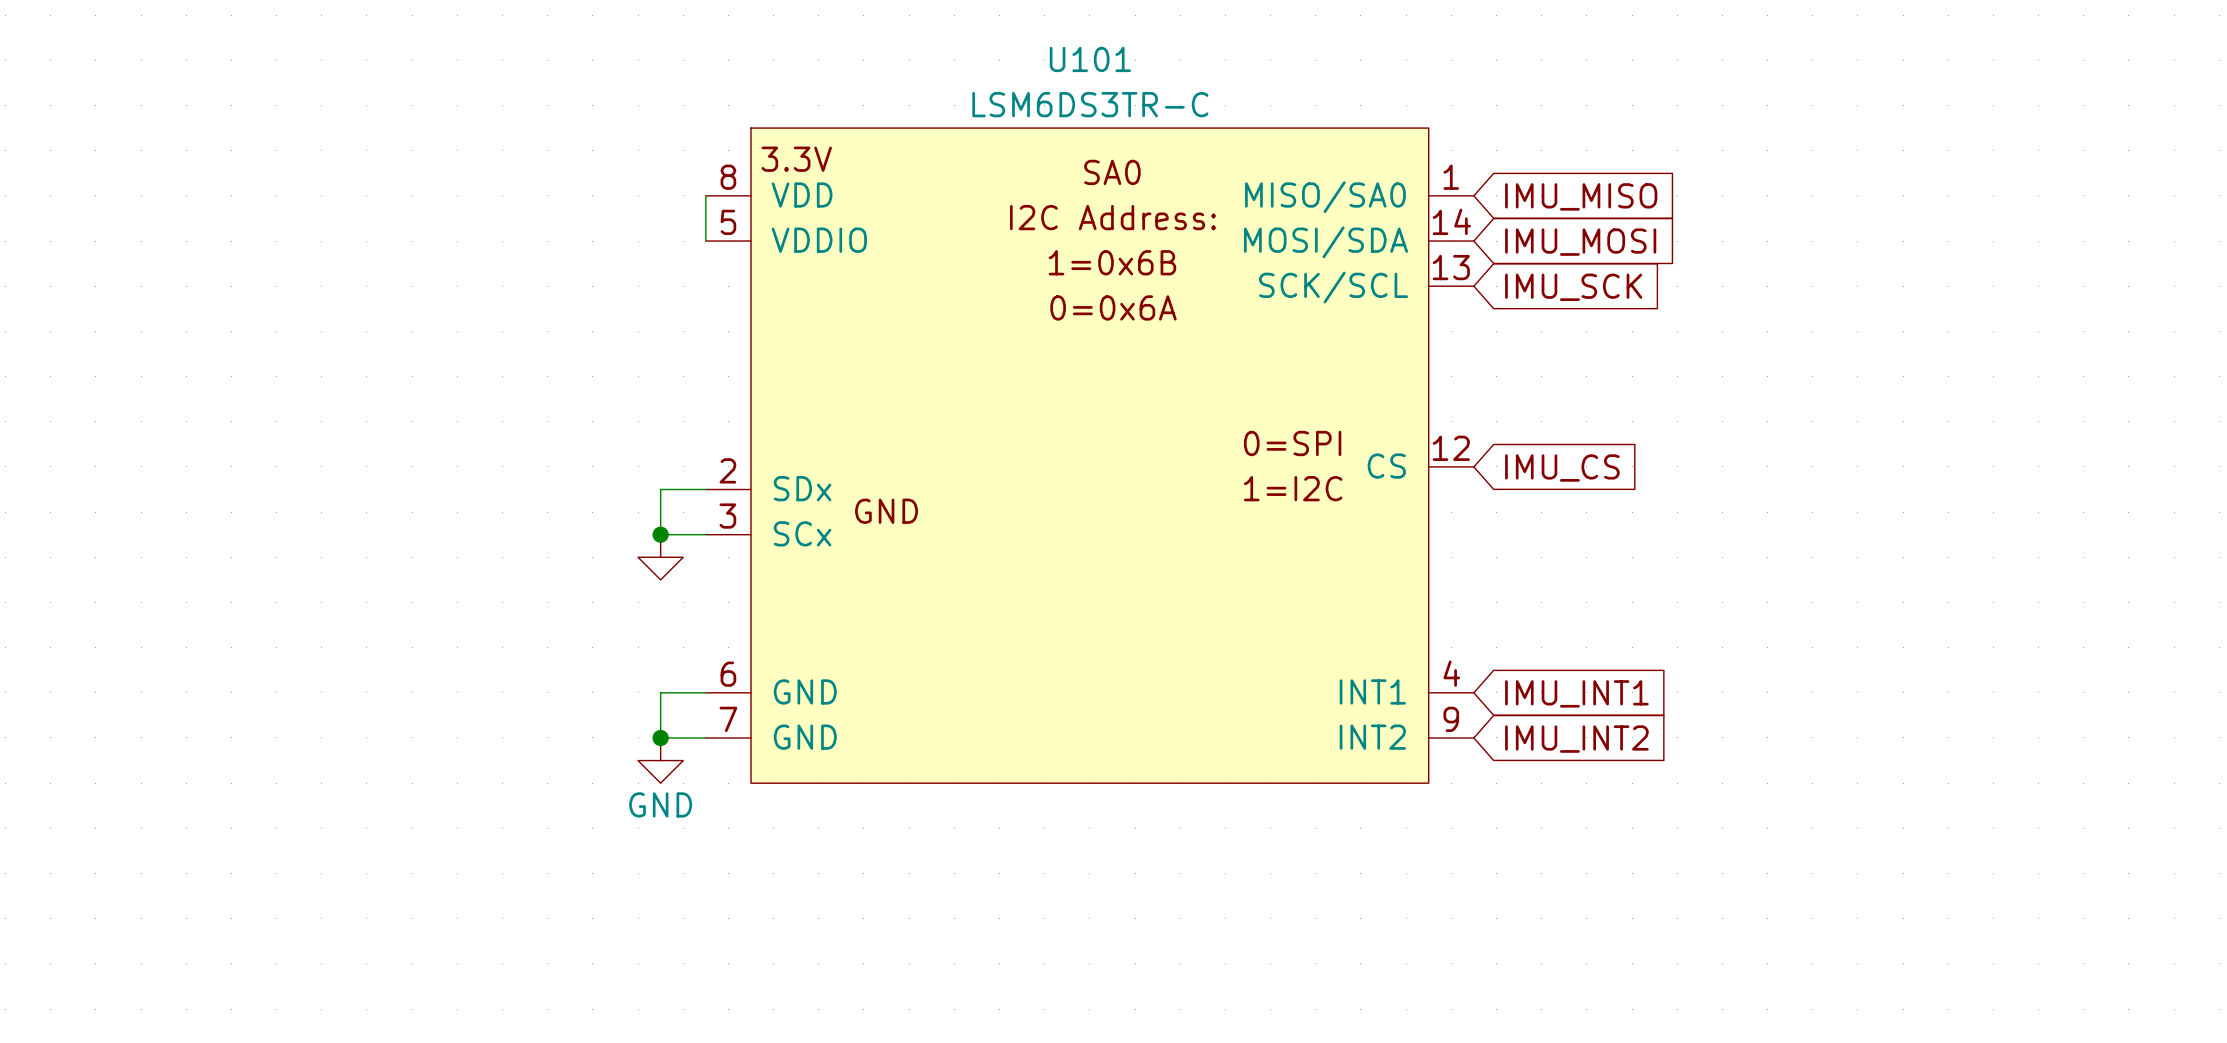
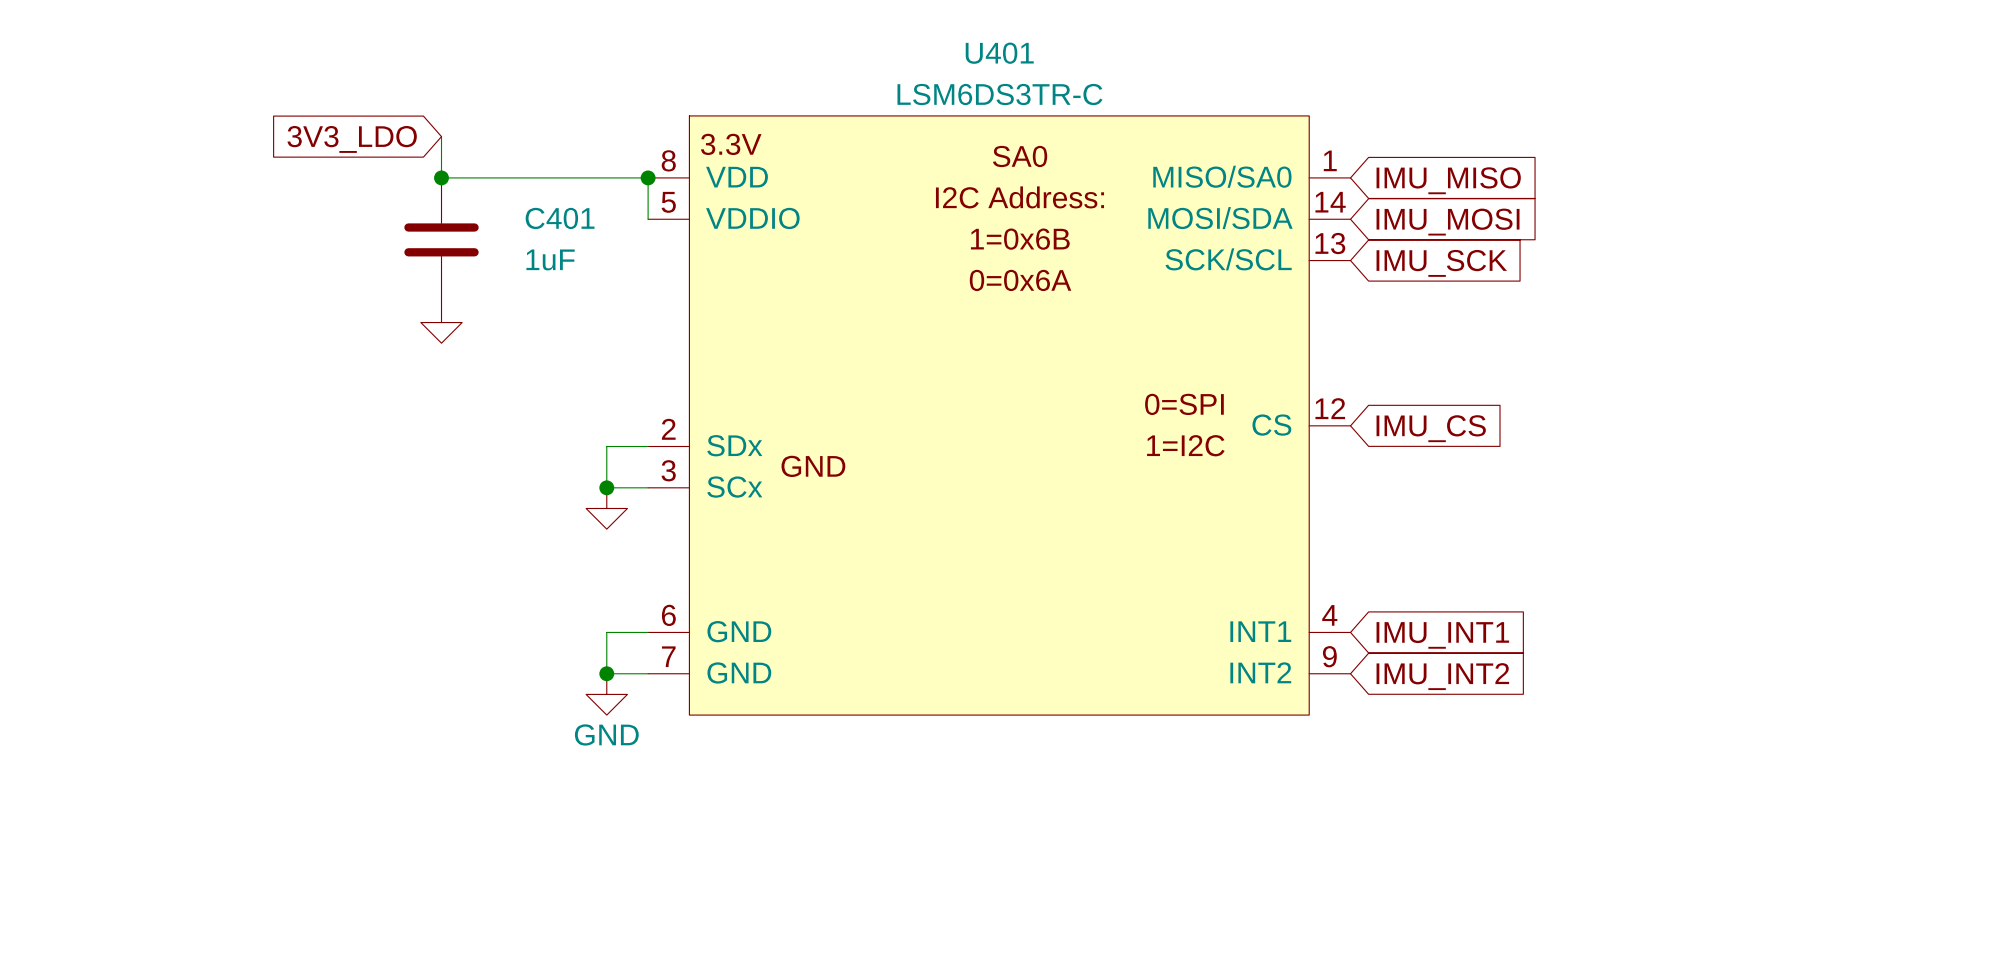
U101 name: U101 (1090, 59) -> U401 (999, 53)
wire: none -> (441, 136) (441, 177) (648, 177)
global label: none -> 3V3_LDO (352, 139)
junction: none -> (441, 177)
junction: none -> (648, 177)
C401: none -> 1uF (441, 239)
power symbol: none -> (441, 322)

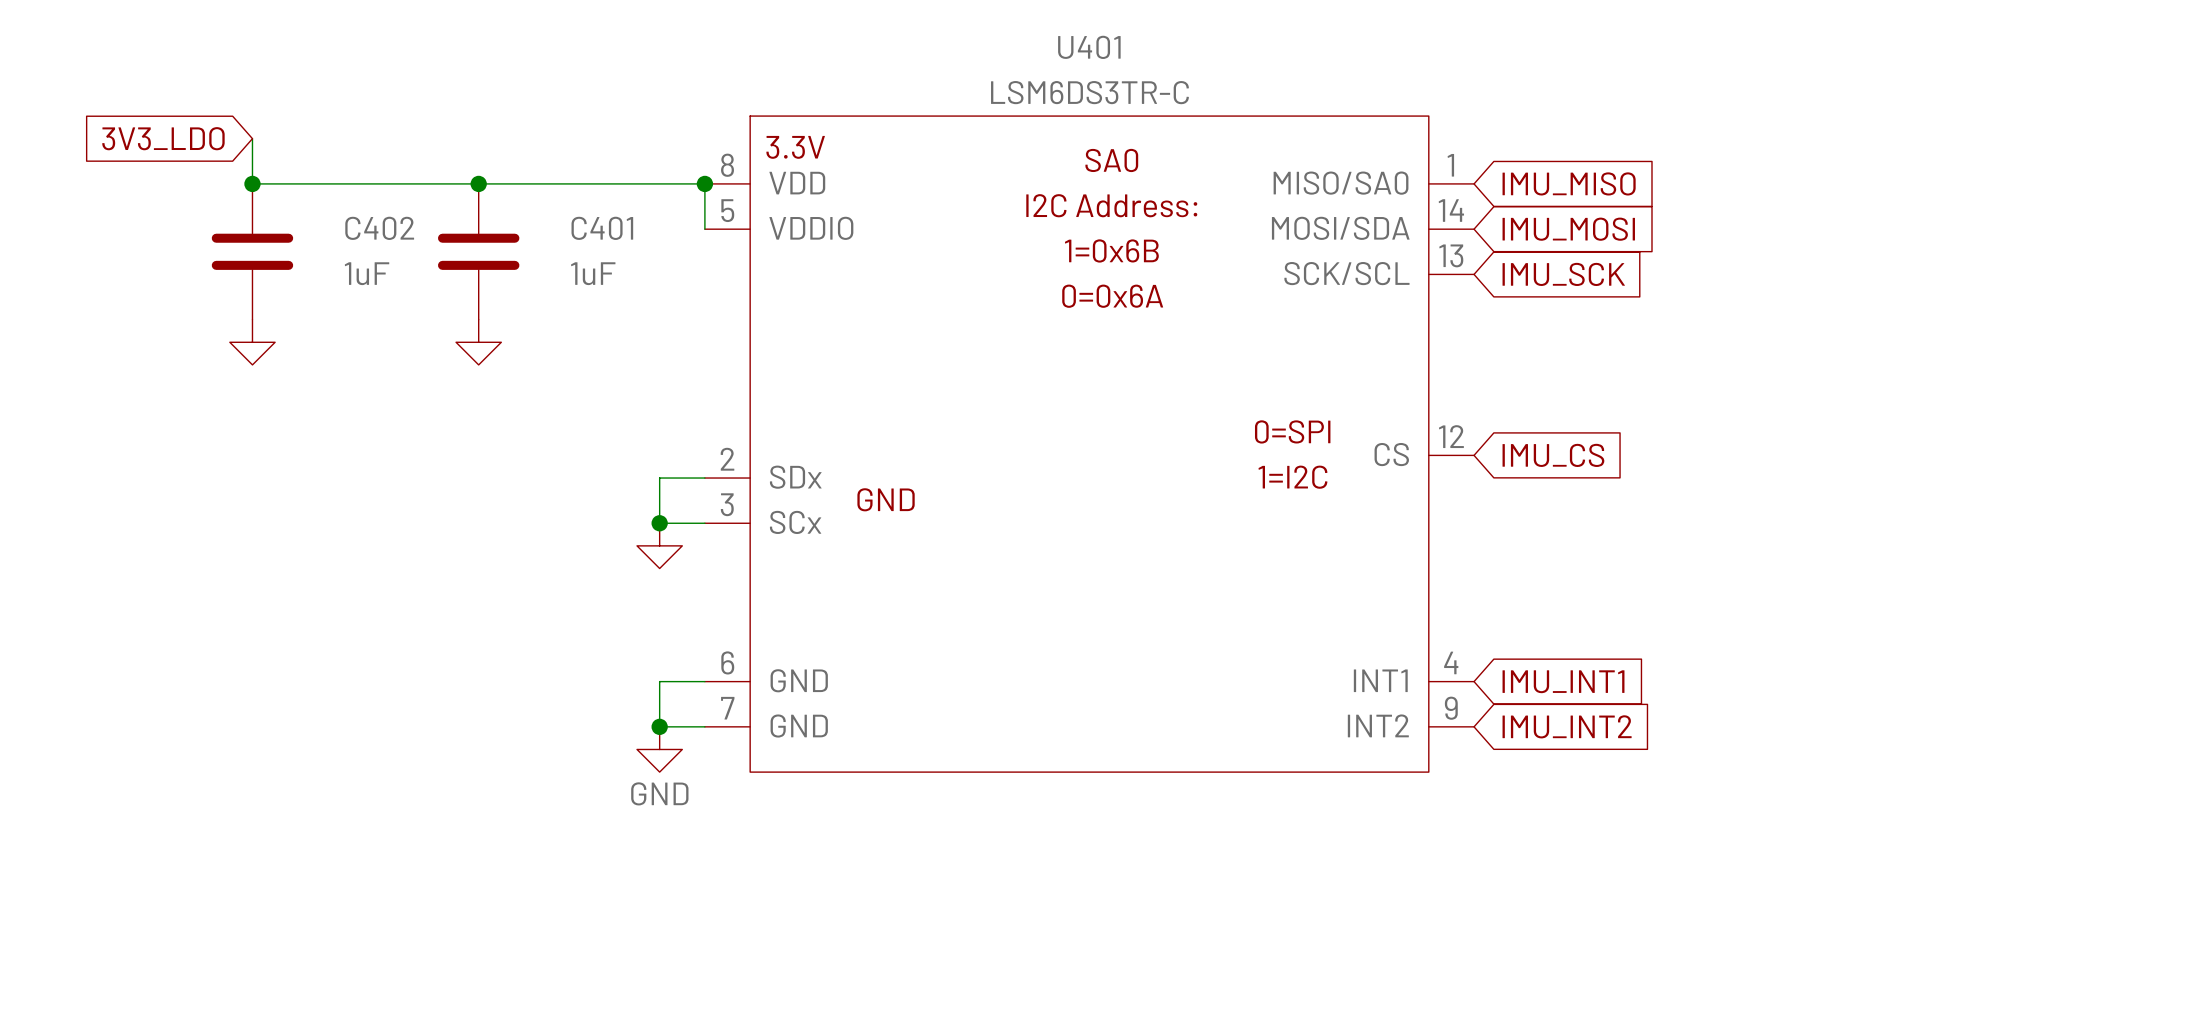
wire: (441, 136) (441, 177) -> (252, 138) (252, 183) (478, 183)
global label position: 3V3_LDO (352, 139) -> 3V3_LDO (163, 138)
junction: none -> (252, 183)
C402: none -> 1uF (252, 251)
power symbol: none -> (252, 342)

